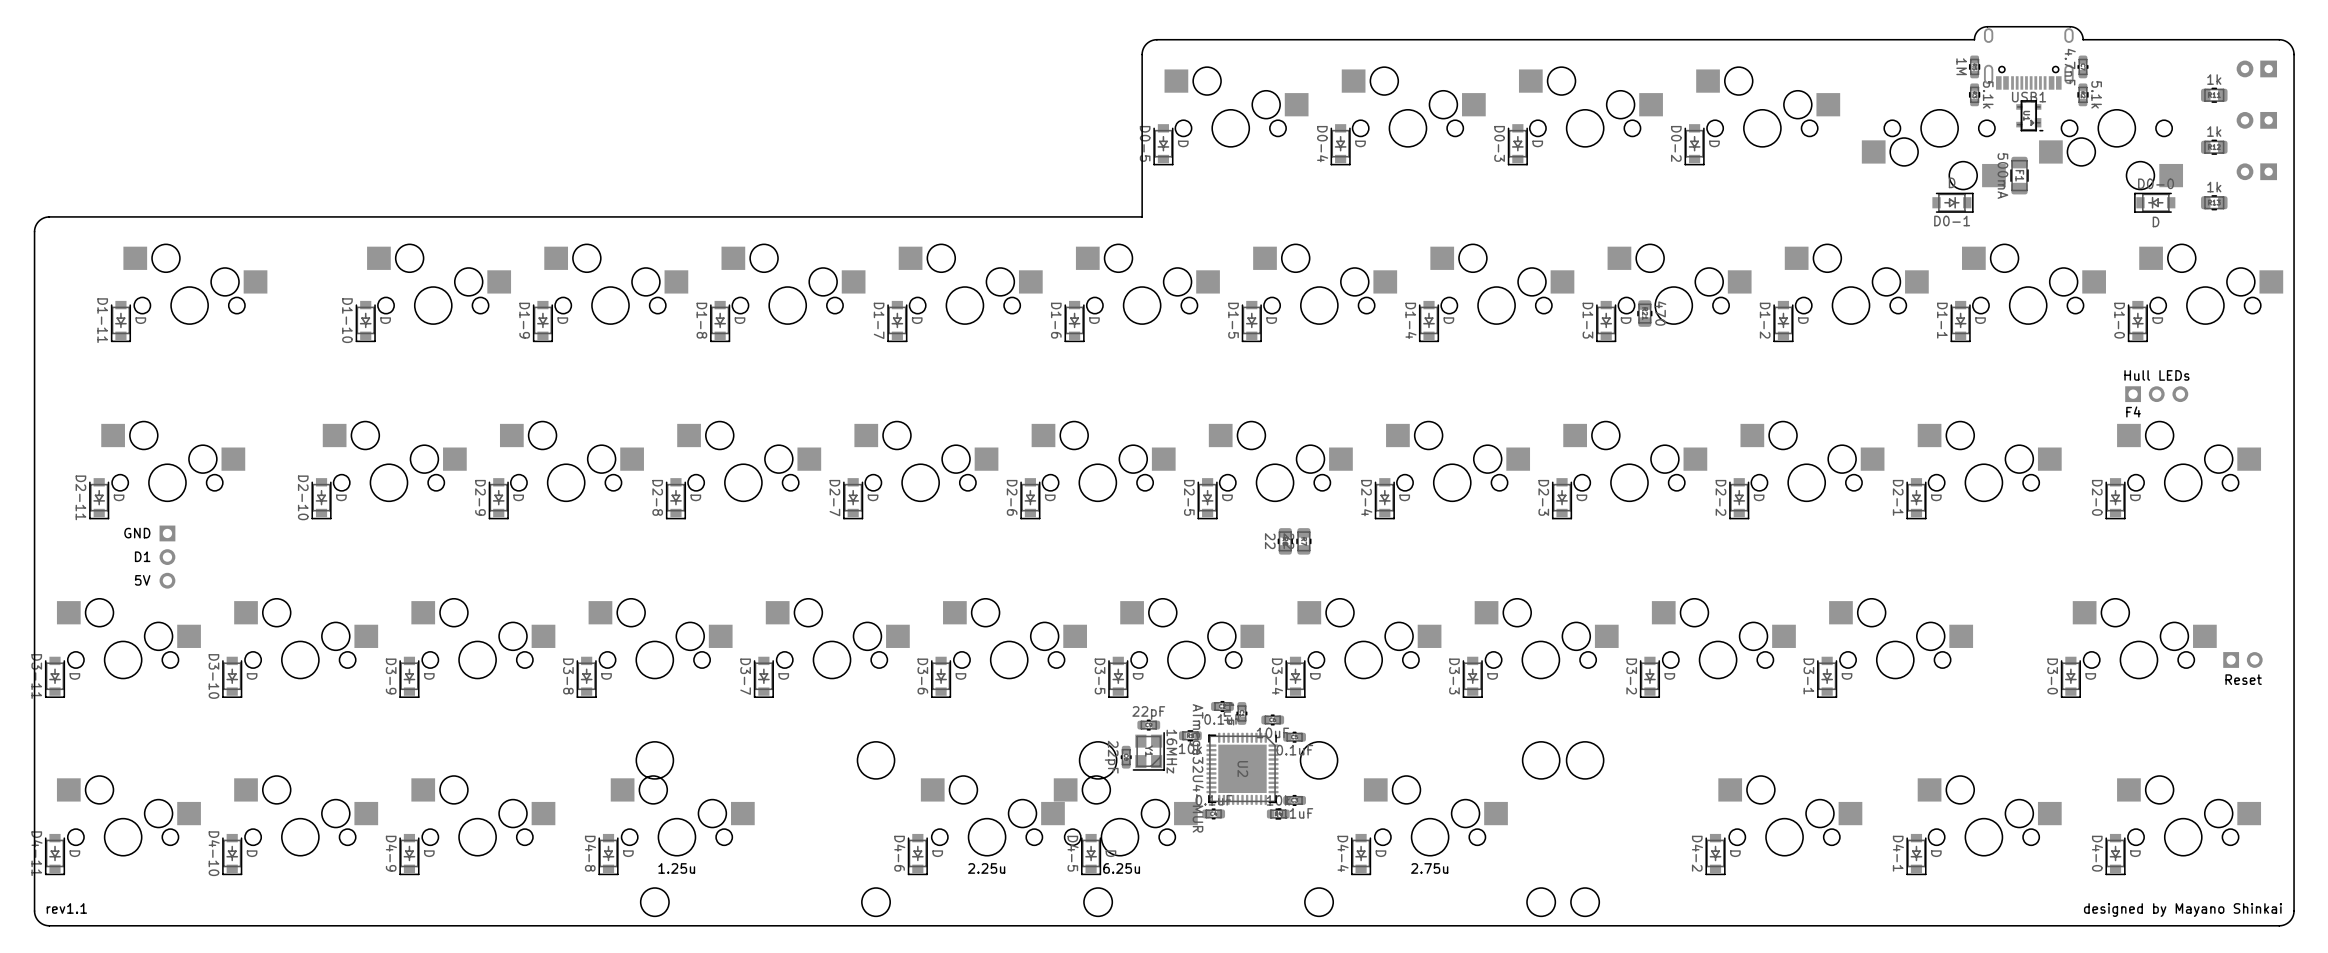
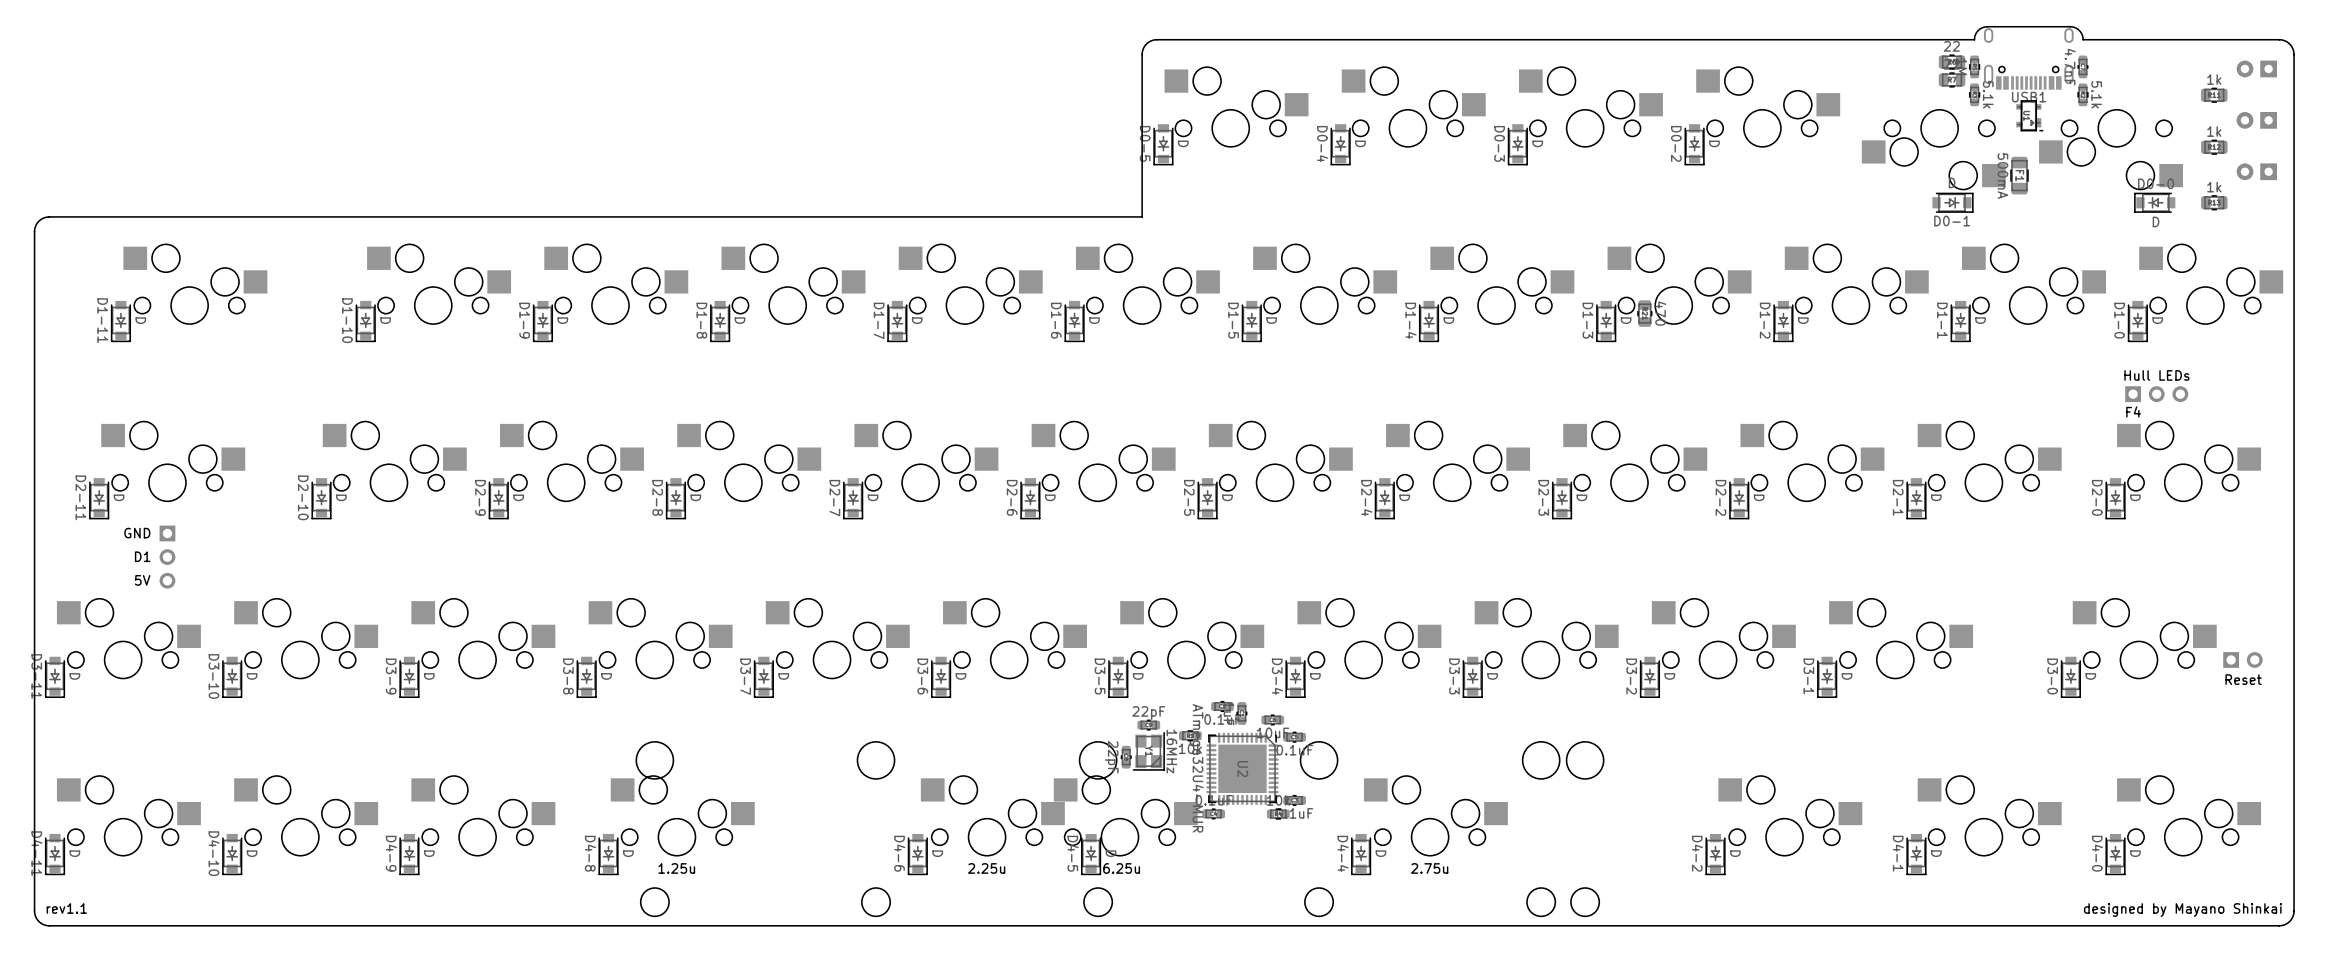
part rotation: 0° (1285, 541) -> 90° clockwise (1952, 62)
part position: (1285, 541) -> (1952, 62)
part rotation: 0° (1303, 541) -> 90° clockwise (1952, 79)
part position: (1303, 541) -> (1952, 79)

